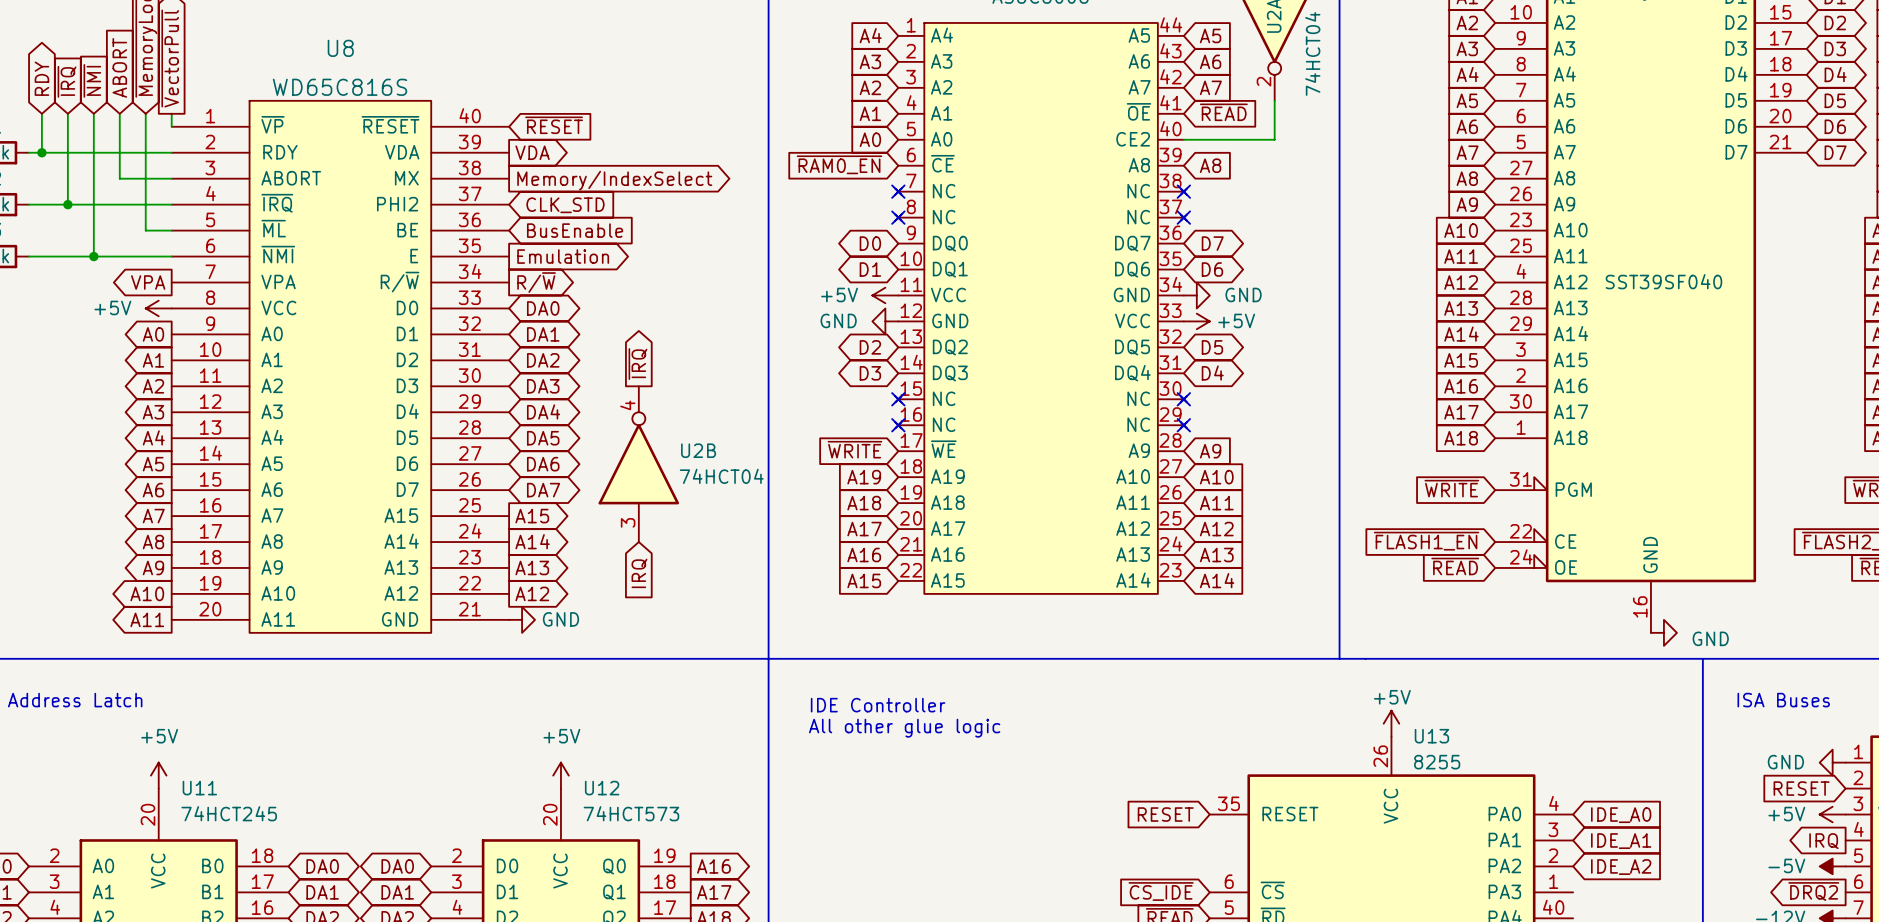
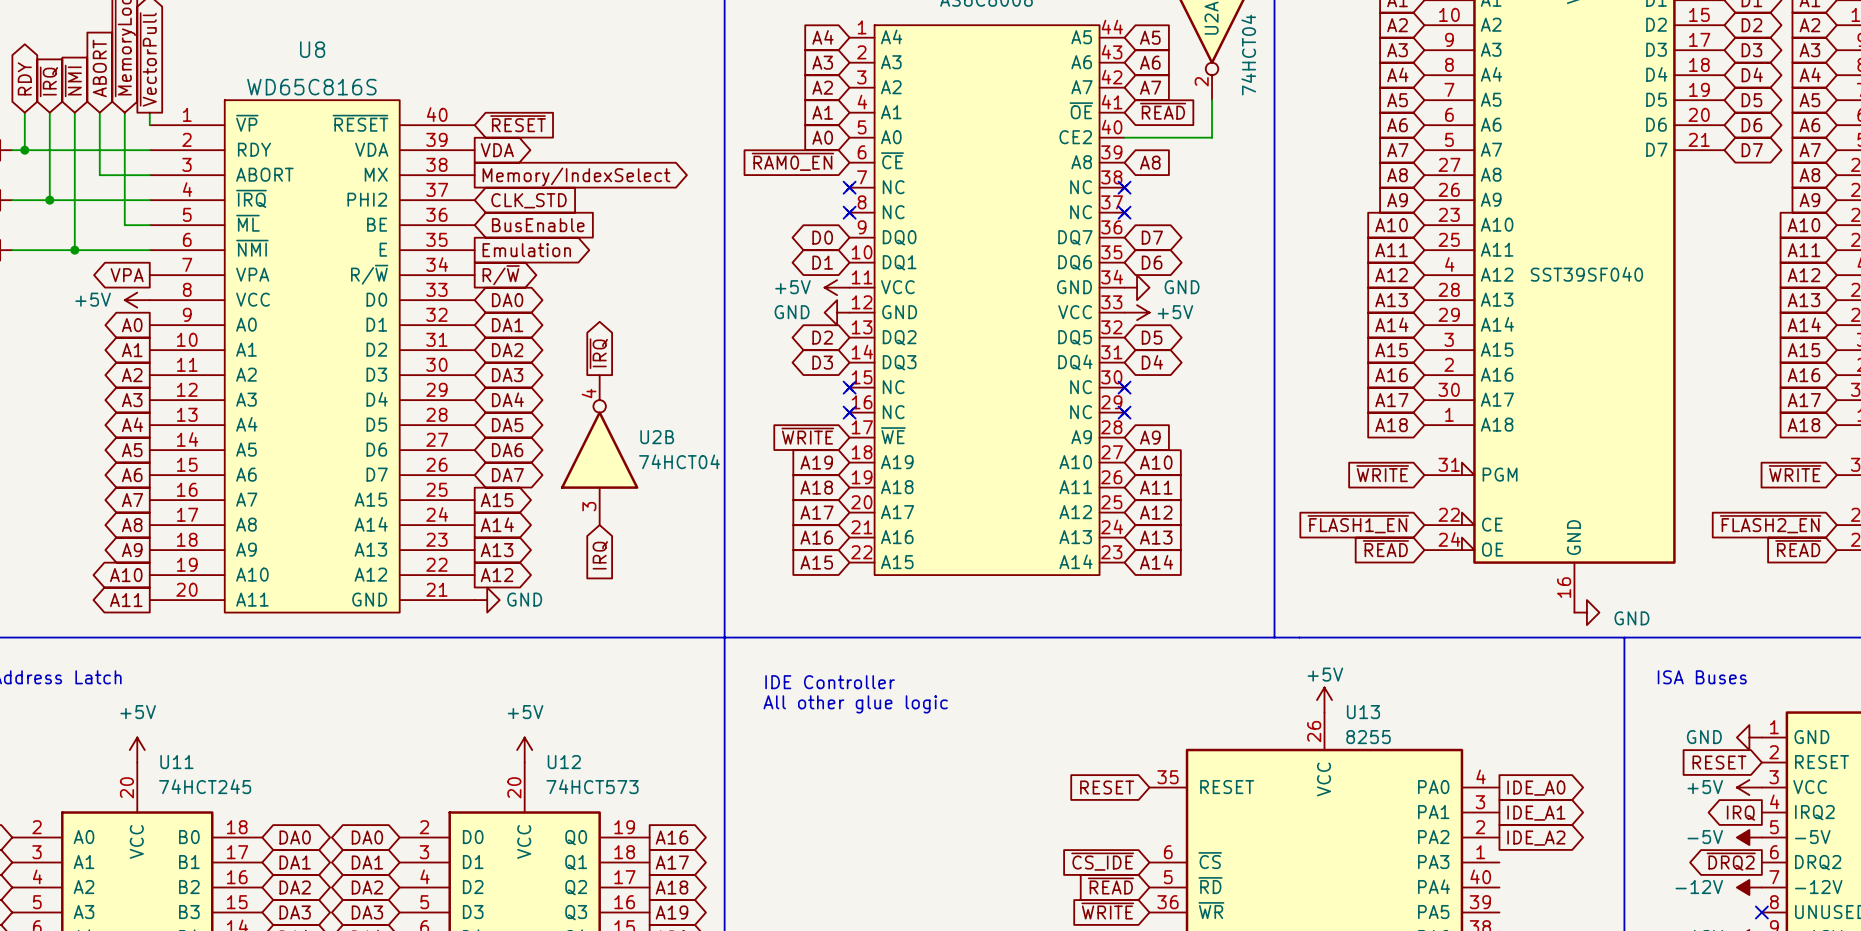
global label shape: input (1621, 815) -> output (1536, 788)
global label shape: input (1621, 841) -> output (1536, 813)
global label shape: input (1621, 867) -> output (1536, 838)

